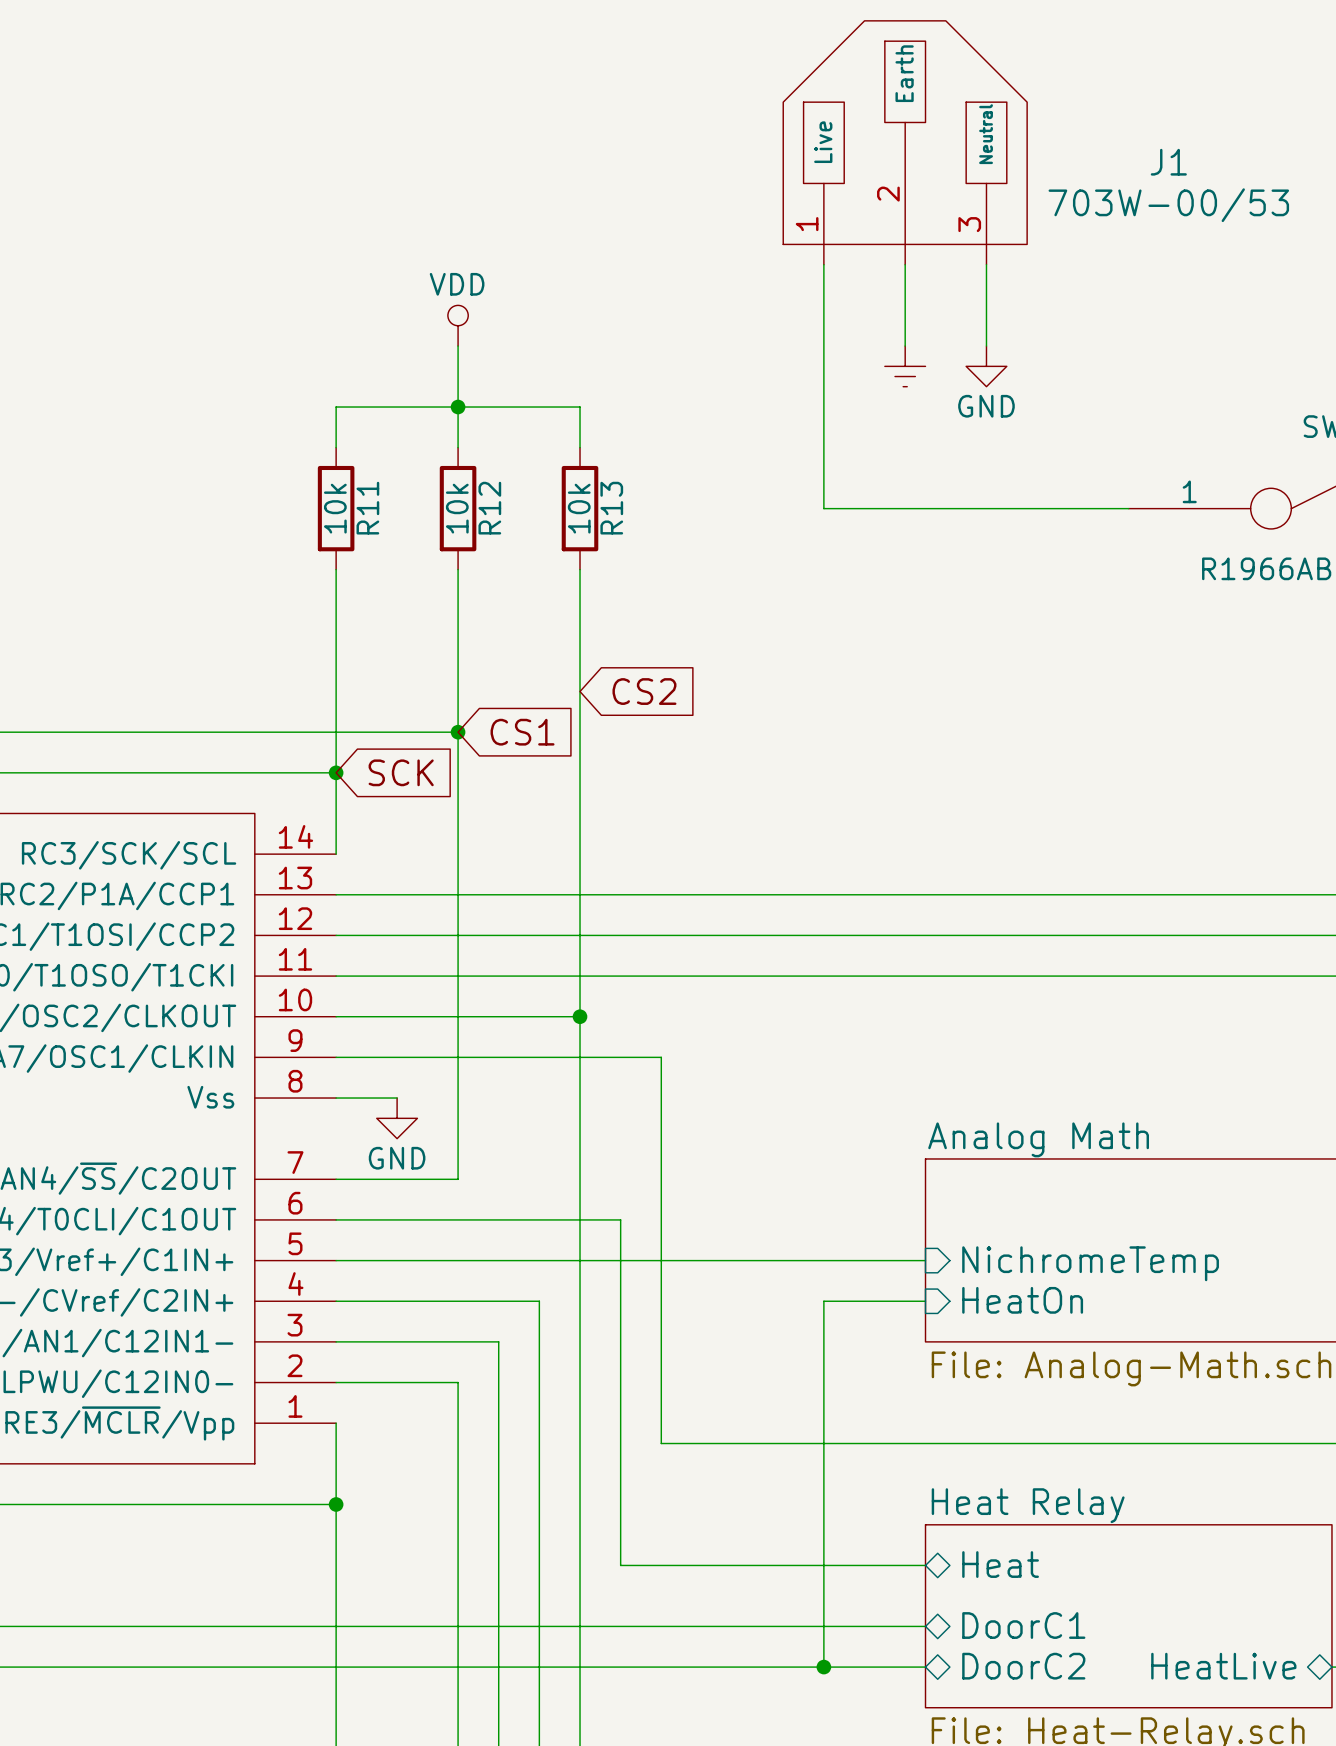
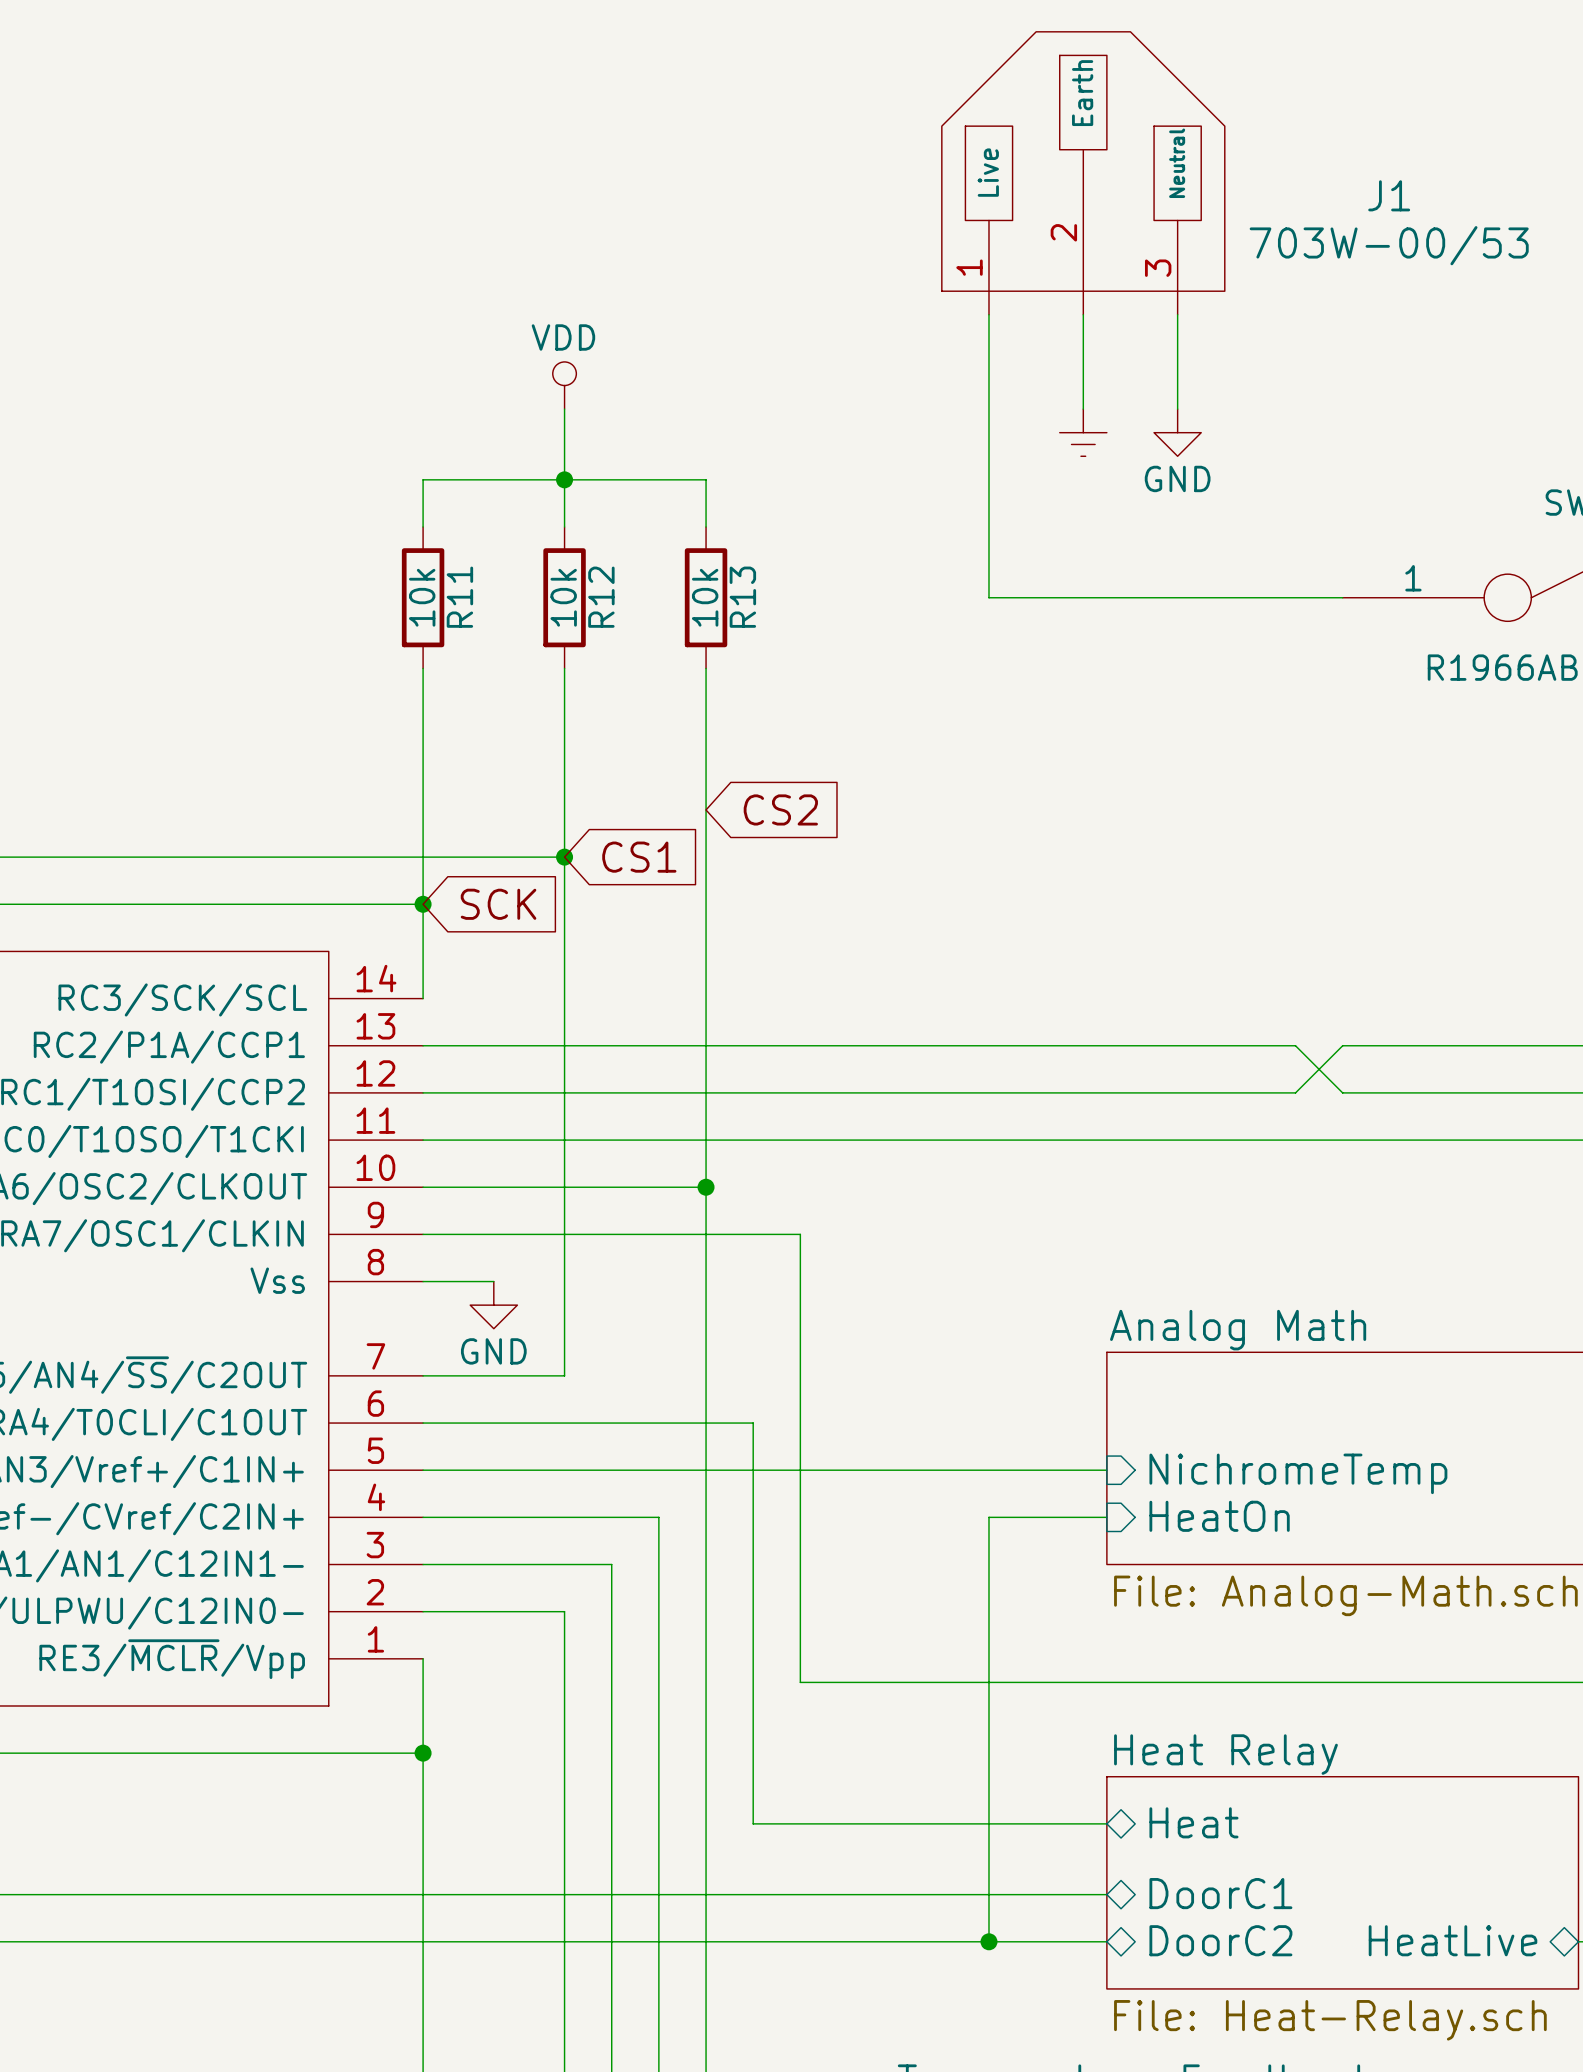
wire: (1088, 894) (1128, 894) -> (1295, 1045) (1342, 1092)
wire: (1088, 935) (1128, 935) -> (1295, 1092) (1342, 1045)

